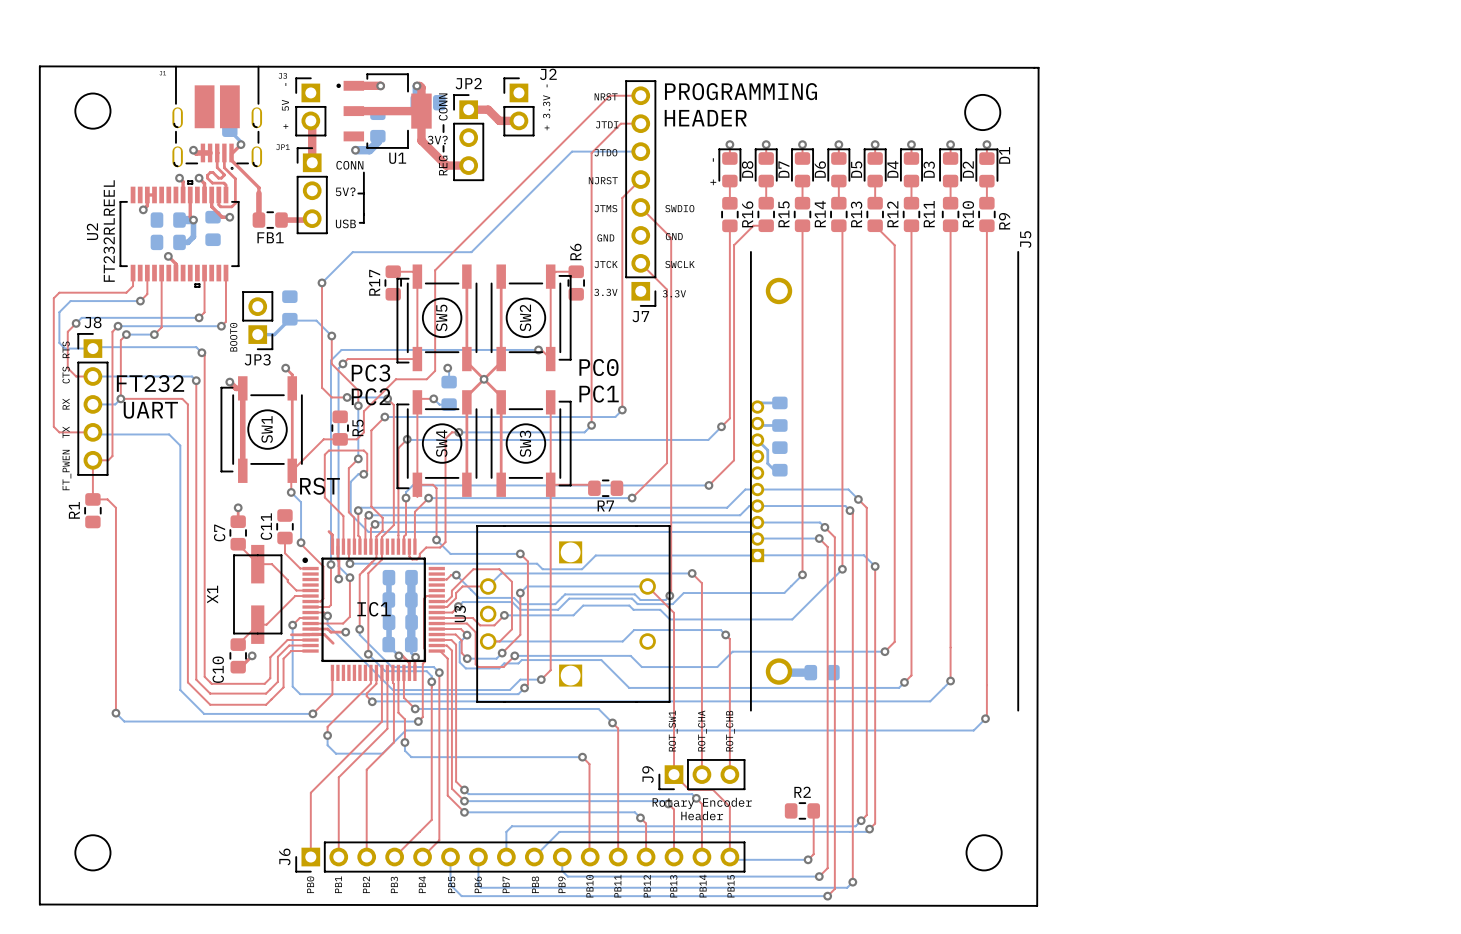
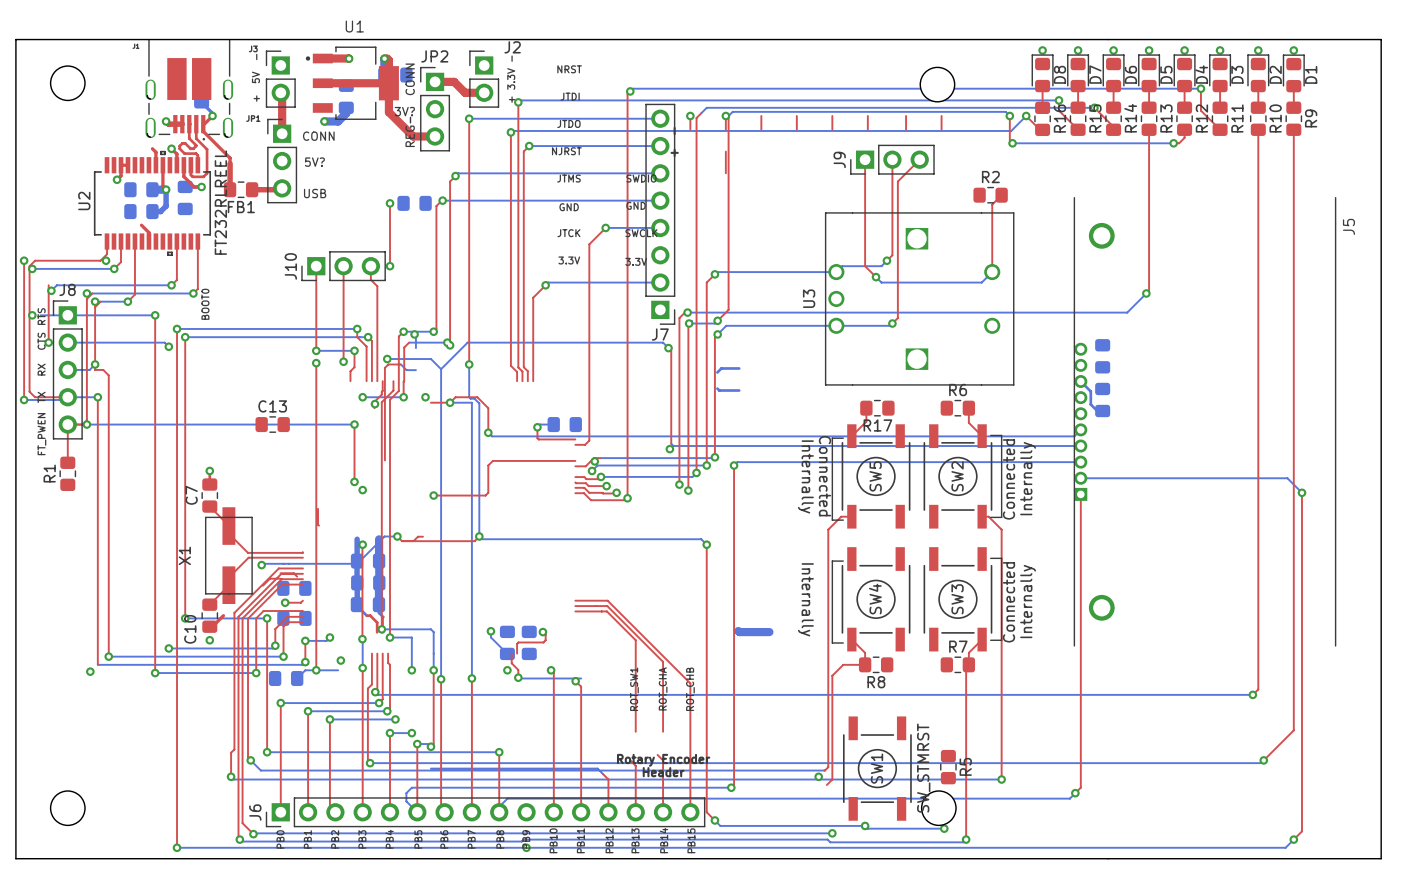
board edge: (39, 66) (1038, 67) (1037, 905) (39, 904) -> (15, 39) (1381, 39) (1381, 858) (15, 858)
via: none -> (1042, 50)
via: none -> (1078, 50)
via: none -> (1113, 50)
via: none -> (1149, 50)
via: none -> (1184, 50)
via: none -> (1220, 50)
via: none -> (1258, 50)
via: none -> (1293, 50)
text: PROGRAMMING (740, 91) -> none
top track: (640, 95) (609, 95) (435, 270) (435, 370) (426, 379) (395, 379) (363, 411) (363, 432) (356, 439) (323, 439) (291, 471) (291, 492) -> none
top track: none -> (1184, 86) (1184, 107)
top track: none -> (1220, 86) (1220, 107)
top track: none -> (1258, 86) (1258, 107)
top track: none -> (1293, 86) (1293, 107)
bottom track: none -> (1200, 88) (633, 88) (630, 91)
top track: none -> (1200, 88) (1200, 110) (1220, 129)
via: none -> (1200, 88)
text: HEADER (705, 118) -> none
top track: none -> (630, 91) (627, 94) (627, 498) (625, 500) (590, 500) (583, 493) (575, 493)
via: none -> (630, 91)
top track: (640, 123) (620, 123) (591, 153) (591, 425) -> none
line: (443, 125) (443, 132) -> none
bottom track: none -> (1058, 100) (520, 100) (518, 102)
top track: none -> (1058, 100) (1058, 110) (1078, 129)
via: none -> (1058, 100)
top track: none -> (518, 102) (518, 367) (522, 371) (522, 381)
via: none -> (518, 102)
bottom track: none -> (1094, 107) (706, 107) (701, 113)
top track: none -> (1094, 107) (1113, 126) (1113, 129)
via: none -> (1094, 107)
top track: none -> (701, 113) (696, 118) (696, 472)
bottom track: none -> (728, 116) (732, 111) (1005, 111) (1009, 116)
top track: none -> (728, 116) (728, 309) (717, 320)
via: (802, 144) -> none
via: (838, 144) -> none
via: (875, 144) -> none
via: (911, 144) -> none
via: (950, 144) -> none
via: (986, 144) -> none
top track: none -> (1009, 116) (1009, 140) (1012, 143)
via: none -> (1009, 116)
bottom track: none -> (1026, 116) (1011, 130) (510, 132)
top track: none -> (1026, 116) (1040, 129) (1042, 129)
via: none -> (1026, 116)
bottom track: none -> (469, 118) (660, 118)
top track: none -> (469, 118) (469, 364)
via: none -> (469, 118)
bottom track: (640, 151) (572, 151) (471, 252) (352, 252) (322, 282) -> none
D1 name position: D1 (1004, 155) -> D1 (1311, 74)
U1 name position: U1 (397, 158) -> U1 (354, 26)
top track: none -> (1149, 129) (1149, 290) (1146, 293)
top track: none -> (1184, 129) (1184, 137) (1179, 143) (1173, 143)
top track: none -> (1258, 129) (1258, 689) (1252, 694)
top track: none -> (1293, 129) (1293, 730) (1263, 760)
top track: none -> (510, 132) (510, 365) (517, 371) (517, 381)
via: none -> (510, 132)
D8 position: (729, 168) -> (1042, 73)
D7 position: (766, 168) -> (1078, 73)
D6 position: (802, 168) -> (1113, 73)
D5 position: (838, 168) -> (1149, 73)
D4 position: (875, 168) -> (1184, 73)
D3 position: (911, 168) -> (1220, 73)
D2 position: (950, 168) -> (1258, 73)
D1 position: (986, 168) -> (1293, 73)
line: (363, 172) (363, 222) (359, 222) -> none
bottom track: none -> (1012, 143) (1173, 143)
via: none -> (1012, 143)
via: none -> (1173, 143)
bottom track: none -> (529, 146) (660, 146)
top track: none -> (529, 146) (523, 151) (523, 367) (527, 371) (527, 381)
via: none -> (529, 146)
via: (179, 178) -> none
top track: (640, 179) (622, 197) (622, 410) -> none
top track: (729, 181) (729, 203) -> none
top track: (802, 181) (802, 203) -> none
top track: (838, 181) (838, 203) -> (1042, 86) (1042, 107)
top track: (875, 181) (875, 203) -> (1078, 86) (1078, 107)
top track: (911, 181) (911, 203) -> (1113, 86) (1113, 107)
top track: (950, 181) (950, 203) -> none
top track: (986, 181) (986, 203) -> (1149, 86) (1149, 107)
top track: none -> (865, 159) (865, 266) (876, 277)
top track: none -> (892, 159) (892, 255) (886, 260)
top track: none -> (919, 159) (897, 181) (897, 318) (892, 323)
line: (358, 193) (363, 193) -> none
J7 position: (640, 193) -> (660, 214)
bottom track: none -> (660, 173) (458, 173) (455, 176)
top track: none -> (455, 176) (450, 181) (450, 339) (447, 342)
via: none -> (455, 176)
top track: (640, 207) (671, 237) (669, 595) -> none
R16 position: (729, 214) -> (1042, 118)
R15 position: (766, 214) -> (1078, 118)
R14 position: (802, 214) -> (1113, 118)
R13 position: (838, 214) -> (1149, 118)
R12 position: (875, 214) -> (1184, 118)
R11 position: (911, 214) -> (1220, 118)
R10 position: (950, 214) -> (1258, 118)
R9 position: (986, 214) -> (1293, 118)
R9 name position: R9 (1004, 221) -> R9 (1311, 118)
top track: (729, 225) (729, 418) (721, 426) -> none
top track: (766, 225) (753, 225) (734, 245) (734, 460) (708, 485) -> none
top track: (802, 225) (802, 574) -> none
top track: (838, 225) (842, 229) (842, 569) -> none
top track: (875, 225) (894, 245) (894, 641) (884, 651) -> none
top track: (911, 225) (911, 675) (904, 682) -> none
top track: (950, 225) (950, 681) -> none
top track: (986, 225) (985, 718) -> none
top track: none -> (1001, 195) (992, 204) (992, 272)
U2 name position: U2 (92, 231) -> U2 (84, 200)
U2 value position: FT232RLREEL (109, 231) -> FT232RLREEL (220, 202)
bottom track: none -> (442, 200) (660, 200)
top track: none -> (442, 200) (436, 206) (436, 328) (433, 331)
via: none -> (442, 200)
top track: none -> (390, 203) (390, 266)
via: none -> (390, 203)
part: none -> (414, 203)
J5 name position: J5 (1025, 239) -> J5 (1348, 226)
via: (168, 256) -> none
bottom track: none -> (605, 227) (660, 227)
top track: none -> (605, 227) (589, 244) (589, 440) (585, 444) (575, 444)
via: none -> (605, 227)
top track: (640, 263) (667, 289) (667, 463) (632, 498) -> none
top track: (393, 271) (412, 271) (417, 276) (417, 359) (347, 359) (342, 363) -> none
top track: (576, 271) (555, 271) (550, 276) (550, 359) (541, 349) (538, 349) -> none
line: (559, 275) (570, 275) (570, 359) (559, 359) -> none
top track: (466, 276) (466, 362) (501, 396) (501, 484) -> none
top track: (501, 276) (501, 362) (466, 396) (466, 484) -> none
line: (408, 278) (397, 278) (397, 362) (408, 362) -> none
top track: (322, 282) (322, 387) (331, 397) (347, 397) -> none
via: (322, 282) -> none
R17 name position: R17 (374, 282) -> R17 (877, 425)
R17 rotation: 0° (393, 283) -> 90° clockwise (877, 408)
R17 position: (393, 283) -> (877, 408)
R6 rotation: 0° (576, 283) -> 90° clockwise (957, 408)
R6 position: (576, 283) -> (957, 408)
top track: none -> (24, 260) (24, 399)
via: none -> (24, 260)
via: none -> (106, 260)
bottom track: none -> (886, 260) (881, 266) (842, 266) (836, 272) (717, 272) (714, 274)
via: none -> (886, 260)
top track: none -> (316, 266) (316, 350)
top track: none -> (343, 266) (343, 361)
J10: none -> (343, 266)
top track: none -> (370, 266) (370, 279) (377, 286) (377, 381)
via: none -> (390, 266)
via: none -> (32, 268)
bottom track: (70, 301) (59, 312) (59, 342) (64, 348) -> (45, 268) (32, 268)
bottom track: none -> (992, 272) (981, 282) (881, 282) (876, 277)
top track: none -> (714, 274) (706, 282) (706, 465)
via: none -> (714, 274)
part: (289, 307) -> none
via: none -> (876, 277)
bottom track: none -> (660, 282) (548, 282) (545, 285)
top track: none -> (48, 285) (48, 342)
SW5 position: (442, 317) -> (876, 476)
SW2 position: (525, 317) -> (957, 476)
top track: none -> (545, 285) (533, 297) (533, 381)
via: none -> (545, 285)
JP3: (257, 320) -> none
top track: (76, 323) (67, 331) (67, 368) (76, 376) (92, 376) -> none
via: none -> (86, 293)
via: (118, 326) -> none
bottom track: none -> (1146, 293) (1127, 312) (687, 312)
via: none -> (1146, 293)
via: none -> (95, 301)
via: (126, 334) -> none
bottom track: (257, 334) (274, 334) (289, 319) (316, 320) (331, 335) -> none
top track: (331, 335) (331, 363) (358, 390) (358, 405) -> none
via: (331, 335) -> none
top track: none -> (687, 312) (684, 312) (679, 318) (679, 484)
via: none -> (687, 312)
via: none -> (32, 315)
bottom track: (92, 348) (196, 347) (201, 352) -> (67, 315) (155, 315)
top track: none -> (155, 315) (155, 673)
via: none -> (155, 315)
bottom track: (538, 349) (341, 349) (330, 360) (330, 564) -> none
via: (538, 349) -> none
top track: (201, 352) (204, 355) (204, 362) -> none
via: (201, 352) -> none
bottom track: none -> (691, 320) (689, 323) (714, 323) (717, 320)
via: none -> (717, 320)
top track: none -> (689, 323) (688, 490)
via: none -> (689, 323)
bottom track: none -> (892, 323) (890, 325) (726, 325) (717, 334)
via: none -> (892, 323)
bottom track: none -> (177, 328) (357, 328)
via: none -> (177, 328)
top track: none -> (357, 328) (357, 337) (366, 346) (366, 381)
via: none -> (357, 328)
bottom track: (342, 363) (338, 368) (338, 566) (349, 577) -> none
via: (342, 363) -> none
bottom track: none -> (403, 331) (433, 331)
top track: none -> (403, 331) (398, 336) (398, 390) (390, 399) (390, 637)
via: none -> (403, 331)
via: none -> (433, 331)
text: PC0 (598, 367) -> none
top track: (285, 368) (292, 374) (292, 470) -> none
via: (285, 368) -> none
top track: none -> (717, 334) (714, 337) (714, 457)
via: none -> (717, 334)
bottom track: none -> (185, 337) (368, 337)
top track: none -> (185, 337) (185, 618)
via: none -> (185, 337)
top track: none -> (368, 337) (371, 340) (371, 381)
via: none -> (368, 337)
text: PC3 (370, 373) -> none
via: none -> (48, 342)
bottom track: none -> (409, 342) (447, 342)
top track: none -> (409, 342) (404, 347) (403, 397)
via: none -> (447, 342)
top track: (196, 380) (196, 679) (210, 693) (266, 693) (277, 681) (277, 656) (289, 645) (310, 645) -> none
top track: (229, 382) (236, 388) (242, 388) (242, 470) -> none
via: (229, 382) -> none
bottom track: none -> (668, 348) (663, 342) (467, 342) (441, 369)
top track: none -> (668, 348) (671, 350) (671, 443)
via: none -> (668, 348)
text: FT232 (150, 383) -> none
bottom track: none -> (316, 350) (354, 350)
via: none -> (316, 350)
top track: none -> (354, 350) (354, 367) (350, 371) (350, 381)
via: none -> (354, 350)
line: (232, 387) (221, 387) (221, 471) (232, 471) -> none
part: none -> (1102, 356)
bottom track: none -> (387, 359) (430, 359) (441, 369)
part: (449, 393) -> none
text: PC1 (599, 394) -> none
top track: none -> (316, 361) (316, 670)
text: PC2 (371, 396) -> none
via: none -> (343, 361)
bottom track: (347, 397) (387, 398) -> none
top track: (120, 398) (182, 398) (187, 404) (187, 682) (210, 704) (266, 704) (283, 687) (283, 658) (291, 651) (310, 651) -> (95, 364) (95, 369) (103, 369) (108, 375) (108, 656)
top track: (387, 398) (393, 405) (393, 525) (381, 537) (381, 559) (368, 573) (368, 654) -> none
via: (387, 398) -> none
via position: (433, 398) -> (387, 359)
bottom track: none -> (469, 364) (469, 397) (474, 398) (479, 403) (479, 536) (482, 539) (701, 539) (706, 544)
via: none -> (469, 364)
line: (559, 401) (570, 401) (570, 485) (559, 485) -> none
top track: (550, 402) (550, 670) (541, 679) -> none
bottom track: none -> (441, 369) (441, 679)
line: (408, 404) (397, 404) (397, 488) (408, 488) -> none
bottom track: (358, 405) (358, 458) -> none
via: (358, 405) -> none
text: UART (150, 410) -> none
bottom track: (622, 410) (615, 417) (384, 417) -> none
via: (622, 410) -> none
part: (779, 414) -> none
top track: none -> (382, 381) (381, 394) (374, 401) (374, 408)
top track: none -> (393, 381) (393, 390) (381, 402) (381, 629)
bottom track: none -> (1080, 381) (1090, 391) (1090, 404) (1097, 410) (1102, 410)
top track: (384, 417) (371, 430) (371, 506) (382, 517) (382, 530) (376, 536) (376, 557) (359, 574) (359, 629) -> none
via: (384, 417) -> none
bottom track: (591, 425) (584, 432) (458, 432) -> none
via: (591, 425) -> none
bottom track: (721, 426) (708, 439) (407, 439) -> none
via: (721, 426) -> none
R5 position: (340, 428) -> (948, 767)
SW1 position: (267, 429) -> (877, 768)
bottom track: (92, 432) (95, 434) (169, 434) (180, 445) (180, 690) (204, 713) (312, 713) -> none
bottom track: none -> (97, 397) (67, 397) (65, 399) (24, 399)
top track: none -> (97, 397) (97, 664)
via: none -> (97, 397)
bottom track: none -> (362, 397) (403, 397)
via: none -> (362, 397)
via: none -> (403, 397)
top track: (458, 432) (451, 432) (445, 438) (445, 542) (440, 547) (426, 547) (416, 559) (412, 559) (409, 556) (409, 546) -> none
via: none -> (24, 399)
part: none -> (1102, 399)
top track: none -> (430, 402) (450, 402) (455, 397) (477, 397) (488, 408) (488, 432)
bottom track: none -> (450, 402) (471, 402) (471, 678)
via: none -> (450, 402)
top track: (407, 439) (398, 448) (398, 546) -> none
bottom track: (757, 440) (767, 450) (767, 463) (774, 470) (779, 470) -> none
SW4 position: (442, 443) -> (876, 599)
SW3 position: (525, 443) -> (957, 599)
top track: none -> (866, 408) (866, 421) (851, 436)
top track: none -> (968, 408) (968, 422) (982, 436)
top track: (358, 458) (348, 468) (348, 512) (354, 517) (354, 546) -> none
via: (358, 458) -> none
part: (779, 458) -> none
bottom track: none -> (67, 424) (354, 424)
via: none -> (86, 424)
C13: none -> (272, 424)
top track: none -> (354, 424) (354, 481)
via: none -> (354, 424)
bottom track: none -> (553, 424) (540, 424) (537, 427)
part: none -> (564, 424)
top track: none -> (537, 427) (538, 439) (575, 439)
via: none -> (537, 427)
bottom track: none -> (1080, 429) (1074, 436) (491, 436) (488, 432)
via: none -> (488, 432)
line: none -> (990, 435) (1001, 435) (1001, 517) (990, 517)
bottom track: (363, 474) (358, 474) (350, 481) (350, 514) (368, 531) (750, 531) (757, 539) (819, 538) -> none
top track: (363, 474) (367, 470) (367, 453) (363, 450) (328, 450) (324, 454) (324, 497) (343, 516) (343, 546) -> none
via: (363, 474) -> none
line: none -> (843, 438) (832, 438) (832, 520) (843, 520)
bottom track: none -> (671, 443) (673, 446) (1080, 446)
J5 position: (884, 481) -> (1204, 421)
top track: (417, 484) (433, 484) (436, 488) (436, 539) -> none
top track: (550, 484) (590, 484) (594, 488) -> none
bottom track: (708, 485) (412, 485) (406, 492) (406, 498) -> none
text: RST (319, 486) -> none
R7 position: (605, 488) -> (957, 664)
bottom track: (291, 492) (301, 502) (301, 542) -> none
via: (291, 492) -> none
bottom track: none -> (714, 457) (600, 458)
via: none -> (714, 457)
top track: none -> (600, 458) (593, 458) (585, 466) (575, 466)
top track: none -> (575, 460) (492, 460) (488, 465) (488, 492) (485, 495) (433, 495)
top track: (406, 498) (406, 534) (403, 536) (403, 546) -> none
via: (406, 498) -> none
bottom track: (428, 498) (632, 498) -> none
top track: (428, 498) (414, 511) (414, 546) -> none
via: (428, 498) -> none
bottom track: none -> (1080, 462) (737, 462) (734, 465)
top track: (92, 499) (107, 499) (115, 507) (115, 713) -> none
bottom track: (858, 499) (848, 489) (745, 489) (727, 507) (361, 507) (358, 510) -> none
top track: (858, 499) (866, 507) (866, 815) (861, 820) -> none
via: (858, 499) -> none
bottom track: none -> (706, 465) (597, 465) (592, 470)
via: none -> (706, 465)
top track: none -> (734, 465) (734, 784) (731, 787)
via: none -> (734, 465)
R7 name position: R7 (605, 505) -> R7 (958, 646)
via: none -> (592, 470)
bottom track: none -> (696, 472) (692, 476) (601, 476)
via: none -> (696, 472)
top track: (358, 510) (359, 546) -> none
via: (358, 510) -> none
bottom track: (850, 510) (845, 506) (749, 506) (740, 515) (368, 515) -> none
top track: (850, 510) (852, 513) (852, 882) -> none
via: (850, 510) -> none
top track: none -> (601, 476) (598, 479) (575, 477)
via: none -> (601, 476)
text: none -> Internally (805, 476)
text: none -> Connected (825, 476)
top track: (368, 515) (365, 518) (365, 546) -> none
via: (368, 515) -> none
text: none -> Internally (1028, 478)
bottom track: none -> (1080, 478) (1287, 478) (1301, 492)
text: none -> Connected (1008, 479)
via: none -> (354, 481)
top track: none -> (575, 482) (585, 483) (588, 486) (606, 486)
via: none -> (679, 484)
via: none -> (606, 486)
bottom track: (375, 524) (376, 522) (820, 522) (824, 527) -> none
top track: (375, 524) (370, 528) (370, 546) -> none
via: (375, 524) -> none
top track: none -> (575, 487) (584, 487) (589, 492) (616, 492)
C11: (284, 526) -> none
via: none -> (362, 490)
via: none -> (688, 490)
top track: (824, 527) (834, 537) (834, 888) (827, 896) -> none
via: (824, 527) -> none
via: none -> (616, 492)
top track: none -> (1301, 492) (1301, 831) (1293, 839)
via: none -> (1301, 492)
top track: (328, 531) (332, 535) (332, 546) -> none
top track: none -> (1080, 494) (1080, 787) (1075, 793)
via: none -> (433, 495)
via: none -> (627, 498)
top track: (284, 538) (284, 553) (300, 568) (310, 568) -> none
top track: (819, 538) (827, 546) (827, 868) (819, 876) -> none
via: (819, 538) -> none
bottom track: (436, 539) (450, 553) (520, 553) -> none
via: (436, 539) -> none
top track: (301, 542) (323, 566) (323, 598) (320, 601) (310, 601) -> none
via: (301, 542) -> none
top track: (337, 546) (338, 579) -> none
top track: (520, 553) (527, 561) (527, 684) (524, 688) -> none
via: (520, 553) -> none
top track: none -> (851, 516) (841, 516) (828, 529) (828, 767) (824, 770)
top track: none -> (982, 516) (988, 516) (1001, 529) (1001, 779)
bottom track: (349, 563) (537, 563) (542, 569) (582, 569) (595, 555) (863, 555) (875, 566) -> none
via: (349, 563) -> none
top track: (257, 564) (271, 564) (296, 590) (310, 590) -> (228, 525) (228, 533) (248, 552) (302, 552)
top track: (330, 564) (330, 604) (328, 607) (310, 607) -> none
via: (330, 564) -> none
top track: (875, 566) (875, 717) -> (851, 639) (865, 652) (865, 664) (843, 664) (832, 675)
via: (875, 566) -> none
bottom track: (842, 569) (792, 619) (669, 619) (660, 609) (633, 609) (629, 605) (583, 605) (573, 615) (504, 615) -> none
via: (842, 569) -> none
bottom track: (692, 573) (501, 573) (488, 586) -> none
top track: (692, 573) (701, 583) (701, 703) -> (575, 606) (607, 606) (663, 661)
via: (692, 573) -> none
bottom track: none -> (397, 536) (384, 536) (357, 563) (261, 565)
top track: none -> (397, 536) (402, 541) (474, 541) (479, 536)
via: none -> (397, 536)
via: none -> (479, 536)
bottom track: (802, 574) (784, 593) (683, 593) (672, 604) (637, 604) (632, 598) (569, 598) (558, 609) (520, 609) (512, 602) (462, 602) (458, 606) -> none
via: (802, 574) -> none
bottom track: (456, 575) (479, 597) (514, 597) (520, 604) (555, 604) (565, 594) (634, 594) (640, 600) (665, 600) (669, 595) -> none
via: (456, 575) -> none
top track: (349, 577) (349, 616) (343, 623) (310, 623) -> none
via: (349, 577) -> none
part: (400, 577) -> none
via: (338, 579) -> none
top track: none -> (362, 544) (362, 639)
via: none -> (362, 544)
top track: none -> (706, 544) (706, 812) (714, 820)
via: none -> (706, 544)
top track: (488, 586) (462, 586) (456, 593) (456, 598) (447, 607) (436, 607) -> none
bottom track: (647, 586) (526, 586) (520, 593) -> none
top track: (647, 586) (674, 612) (674, 681) -> (575, 611) (606, 611) (635, 640)
top track: (520, 593) (520, 634) (502, 653) -> none
via: (520, 593) -> none
via: (669, 595) -> none
top track: (310, 596) (295, 596) (266, 624) (257, 624) -> (302, 557) (248, 557) (228, 577) (228, 585)
top track: (436, 596) (426, 596) (423, 598) (425, 661) (422, 663) (422, 717) (418, 721) -> none
line: none -> (990, 558) (1001, 558) (1001, 640) (990, 640)
line: none -> (843, 561) (832, 561) (832, 642) (843, 642)
top track: (436, 601) (446, 601) (451, 596) (451, 590) (473, 569) (499, 569) (511, 581) (511, 629) (499, 641) (488, 641) -> none
via: none -> (261, 565)
top track: (458, 606) (452, 612) (436, 612) -> none
via: (458, 606) -> none
top track: none -> (302, 568) (278, 568) (234, 612) (234, 749) (231, 752) (231, 776)
IC1: (373, 609) -> none
top track: none -> (302, 573) (281, 573) (238, 616) (239, 839)
U3 position: (573, 613) -> (919, 298)
bottom track: (327, 615) (327, 624) (392, 690) (509, 690) (520, 679) (541, 679) -> none
via: (327, 615) -> none
top track: (504, 615) (494, 625) (480, 625) (472, 618) (436, 618) -> none
via: (504, 615) -> none
top track: none -> (302, 579) (281, 579) (242, 618) (242, 823) (253, 834)
top track: (436, 623) (467, 623) (475, 632) (475, 664) (478, 667) (503, 667) (514, 655) -> none
top track: none -> (302, 584) (282, 584) (248, 618) (248, 757) (250, 760)
bottom track: (292, 625) (292, 686) (300, 694) (518, 694) (524, 688) -> none
via: (292, 625) -> none
part: none -> (294, 588)
top track: (310, 629) (327, 629) (331, 632) (345, 632) -> none
bottom track: (359, 629) (359, 634) (391, 667) (433, 667) (439, 672) -> none
via: (359, 629) -> none
top track: (436, 629) (460, 629) (467, 635) -> none
via: (345, 632) -> none
top track: (291, 634) (324, 634) (333, 643) -> none
top track: (436, 634) (455, 634) (461, 640) (461, 653) (467, 658) -> none
bottom track: (725, 634) (720, 630) (634, 630) (622, 641) (488, 641) -> none
top track: (725, 634) (729, 639) (729, 725) -> (575, 600) (607, 600) (690, 683)
via: (725, 634) -> none
bottom track: (467, 635) (459, 642) (459, 662) (465, 668) (499, 668) (504, 663) (518, 663) (521, 660) (601, 660) (629, 687) (898, 687) (904, 682) -> none
via: (467, 635) -> none
text: none -> Internally (805, 599)
top track: (310, 640) (287, 640) (270, 657) (270, 678) (264, 683) (211, 683) (204, 676) -> (177, 847) (177, 636)
top track: none -> (302, 600) (300, 602) (285, 602)
top track: (436, 640) (451, 640) (456, 644) (456, 781) (464, 789) -> none
text: none -> Internally (1028, 601)
via: none -> (285, 602)
text: none -> Connected (1008, 602)
top track: (436, 645) (446, 645) (451, 650) (451, 788) (464, 801) -> none
top track: none -> (302, 611) (263, 611) (256, 618) (256, 673)
top track: (436, 651) (440, 651) (447, 658) (447, 795) (464, 812) -> none
bottom track: (884, 651) (732, 651) (717, 667) (641, 667) (630, 655) (514, 655) -> none
via: (884, 651) -> none
bottom track: (502, 653) (496, 658) (467, 658) -> none
via: (502, 653) -> none
bottom track: (368, 654) (385, 671) (426, 671) (431, 676) (431, 681) -> none
via: (368, 654) -> none
via: (252, 655) -> none
via: (398, 655) -> none
via: (514, 655) -> none
top track: none -> (302, 616) (287, 616) (275, 629) (275, 645)
via: (415, 657) -> none
bottom track: none -> (185, 618) (267, 618)
via: none -> (185, 618)
top track: none -> (267, 618) (267, 752)
via: none -> (267, 618)
part: none -> (294, 618)
via: (467, 658) -> none
top track: none -> (302, 622) (287, 622) (283, 626) (283, 656)
bottom track: none -> (381, 629) (430, 629) (433, 632) (433, 670)
via: none -> (381, 629)
bottom track: none -> (490, 631) (490, 637) (507, 653)
via: none -> (490, 631)
top track: (332, 672) (332, 694) (312, 713) -> none
top track: (370, 672) (370, 683) (327, 726) (327, 735) -> none
top track: (376, 672) (376, 683) (366, 693) (372, 701) -> none
top track: (381, 672) (381, 721) (310, 792) -> (280, 703) (280, 749)
top track: (387, 672) (387, 728) (338, 777) -> (308, 711) (308, 734)
top track: (392, 672) (393, 742) (366, 769) (366, 857) -> (329, 719) (329, 806) (335, 812)
top track: (398, 672) (398, 712) (404, 719) (404, 742) -> none
top track: (403, 672) (403, 697) (415, 708) -> none
top track: (439, 672) (439, 840) (422, 857) -> (390, 733) (390, 812)
via: (439, 672) -> none
top track: none -> (542, 632) (545, 634) (545, 640) (543, 642) (518, 642) (517, 653)
via: none -> (542, 632)
part: (822, 672) -> none
bottom track: none -> (329, 637) (326, 640) (305, 640)
via: none -> (329, 637)
bottom track: none -> (390, 637) (411, 637) (411, 670)
via: none -> (390, 637)
bottom track: none -> (362, 639) (362, 668)
via: none -> (362, 639)
via: (541, 679) -> none
top track: none -> (982, 639) (968, 652) (968, 664) (966, 667) (966, 839)
via: none -> (209, 640)
top track: none -> (305, 640) (305, 662)
via: none -> (305, 640)
top track: (431, 681) (431, 819) (394, 857) -> (362, 668) (362, 812)
via: (431, 681) -> none
bottom track: (950, 681) (930, 701) (372, 701) -> none
via: (950, 681) -> none
via: (904, 682) -> none
part: none -> (507, 642)
part: none -> (529, 642)
bottom track: none -> (275, 645) (272, 648) (168, 648)
via: none -> (275, 645)
via: (524, 688) -> none
via: none -> (168, 648)
top track: none -> (371, 653) (371, 684) (367, 688) (367, 760) (370, 763)
top track: none -> (377, 653) (377, 690) (375, 692)
top track: none -> (382, 653) (382, 699) (379, 703)
top track: none -> (388, 653) (388, 662) (390, 664) (390, 708) (387, 711)
top track: none -> (511, 653) (511, 663) (518, 669) (518, 677)
bottom track: none -> (108, 656) (283, 656)
via: none -> (108, 656)
via: none -> (283, 656)
bottom track: none -> (305, 662) (302, 664) (97, 664)
via: none -> (305, 662)
R8: none -> (876, 664)
bottom track: (415, 708) (598, 708) (612, 722) -> none
via: (415, 708) -> none
via: none -> (362, 668)
via: none -> (316, 670)
bottom track: none -> (338, 670) (305, 670) (297, 678)
via: none -> (411, 670)
top track: none -> (433, 670) (433, 744)
via: none -> (433, 670)
via: none -> (507, 670)
via: none -> (551, 670)
bottom track: (115, 713) (124, 721) (418, 721) -> none
via: (312, 713) -> none
bottom track: none -> (155, 673) (256, 673)
via: none -> (155, 673)
via: none -> (256, 673)
bottom track: (985, 718) (973, 730) (405, 730) (382, 753) -> (387, 711) (350, 711)
via: (985, 718) -> none
bottom track: none -> (518, 677) (581, 678)
via: none -> (518, 677)
part: none -> (286, 678)
top track: none -> (441, 679) (441, 808) (444, 812)
via: none -> (441, 679)
top track: none -> (471, 678) (471, 812)
via: none -> (471, 678)
via: (418, 721) -> none
bottom track: none -> (375, 692) (378, 694) (1252, 694)
via: none -> (375, 692)
bottom track: (327, 735) (327, 745) (335, 753) (338, 753) -> none
via: (327, 735) -> none
via: none -> (1252, 694)
bottom track: (404, 742) (404, 750) (411, 757) (582, 757) -> none
via: (404, 742) -> none
bottom track: none -> (280, 703) (379, 703)
via: none -> (280, 703)
via: none -> (379, 703)
via: none -> (308, 711)
via: none -> (387, 711)
top track: (582, 757) (589, 764) (590, 857) -> (551, 670) (553, 673) (553, 812)
via: (582, 757) -> none
bottom track: none -> (329, 719) (395, 719)
via: none -> (329, 719)
via: none -> (395, 719)
top track: (674, 774) (689, 789) (713, 789) (729, 806) -> (690, 731) (690, 763)
J9 position: (701, 774) -> (892, 159)
bottom track: none -> (390, 733) (411, 733)
via: none -> (390, 733)
via: none -> (411, 733)
bottom track: none -> (417, 744) (433, 744)
top track: none -> (417, 744) (417, 812)
via: none -> (417, 744)
bottom track: (464, 789) (468, 794) (692, 794) (696, 798) -> none
bottom track: none -> (267, 752) (499, 752)
via: none -> (267, 752)
top track: none -> (499, 752) (499, 812)
via: none -> (499, 752)
via: (696, 798) -> none
bottom track: (464, 801) (665, 801) (668, 803) -> none
via: (464, 801) -> none
bottom track: none -> (250, 760) (260, 770) (824, 770)
via: none -> (250, 760)
via: (668, 803) -> none
bottom track: none -> (1263, 760) (1261, 763) (370, 763)
via: none -> (1263, 760)
via: none -> (370, 763)
R2 position: (802, 810) -> (990, 195)
top track: (813, 810) (813, 854) (808, 859) -> none
via: (464, 812) -> none
SW1 value: none -> SW_STMRST (923, 768)
via: (640, 817) -> none
bottom track: none -> (231, 776) (233, 779) (1001, 779)
via: none -> (231, 776)
bottom track: (861, 820) (855, 826) (511, 826) (506, 831) (506, 857) -> none
via: none -> (1001, 779)
bottom track: (869, 829) (866, 831) (771, 831) -> none
via: (869, 829) -> none
bottom track: (559, 831) (534, 857) -> (523, 787) (411, 787) (406, 793) (406, 801) (417, 812)
via: none -> (731, 787)
bottom track: none -> (1075, 793) (1069, 798) (507, 798) (499, 806) (499, 812)
via: none -> (1075, 793)
bottom track: (450, 857) (450, 884) (461, 896) (827, 896) -> none
bottom track: (478, 857) (478, 884) (481, 887) (847, 887) (852, 882) -> none
bottom track: (562, 857) (562, 870) (567, 876) (819, 876) -> none
bottom track: (729, 857) (732, 859) (808, 859) -> none
via: (808, 859) -> none
bottom track: none -> (714, 820) (720, 825) (865, 825) (867, 828) (944, 828)
via: none -> (714, 820)
via: none -> (865, 825)
via: none -> (944, 828)
via: (819, 876) -> none
bottom track: none -> (832, 833) (253, 834)
via: none -> (253, 834)
via position: (852, 882) -> (832, 833)
bottom track: none -> (239, 839) (241, 841) (827, 839) (830, 842) (963, 842) (966, 839)
via: none -> (239, 839)
via: none -> (966, 839)
bottom track: none -> (1293, 839) (1285, 847) (177, 847)
via: none -> (1293, 839)
via: none -> (177, 847)
via: none -> (526, 847)
via: (827, 896) -> none

